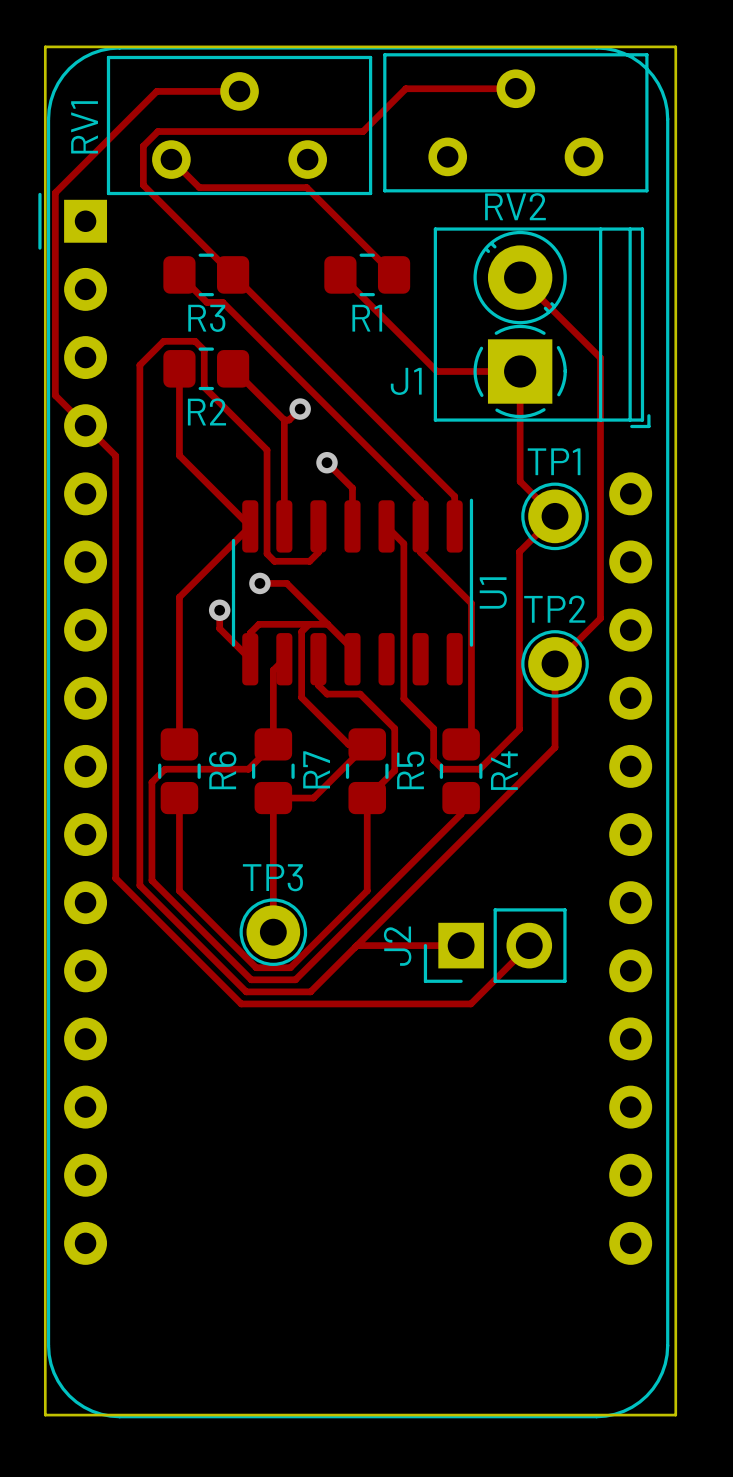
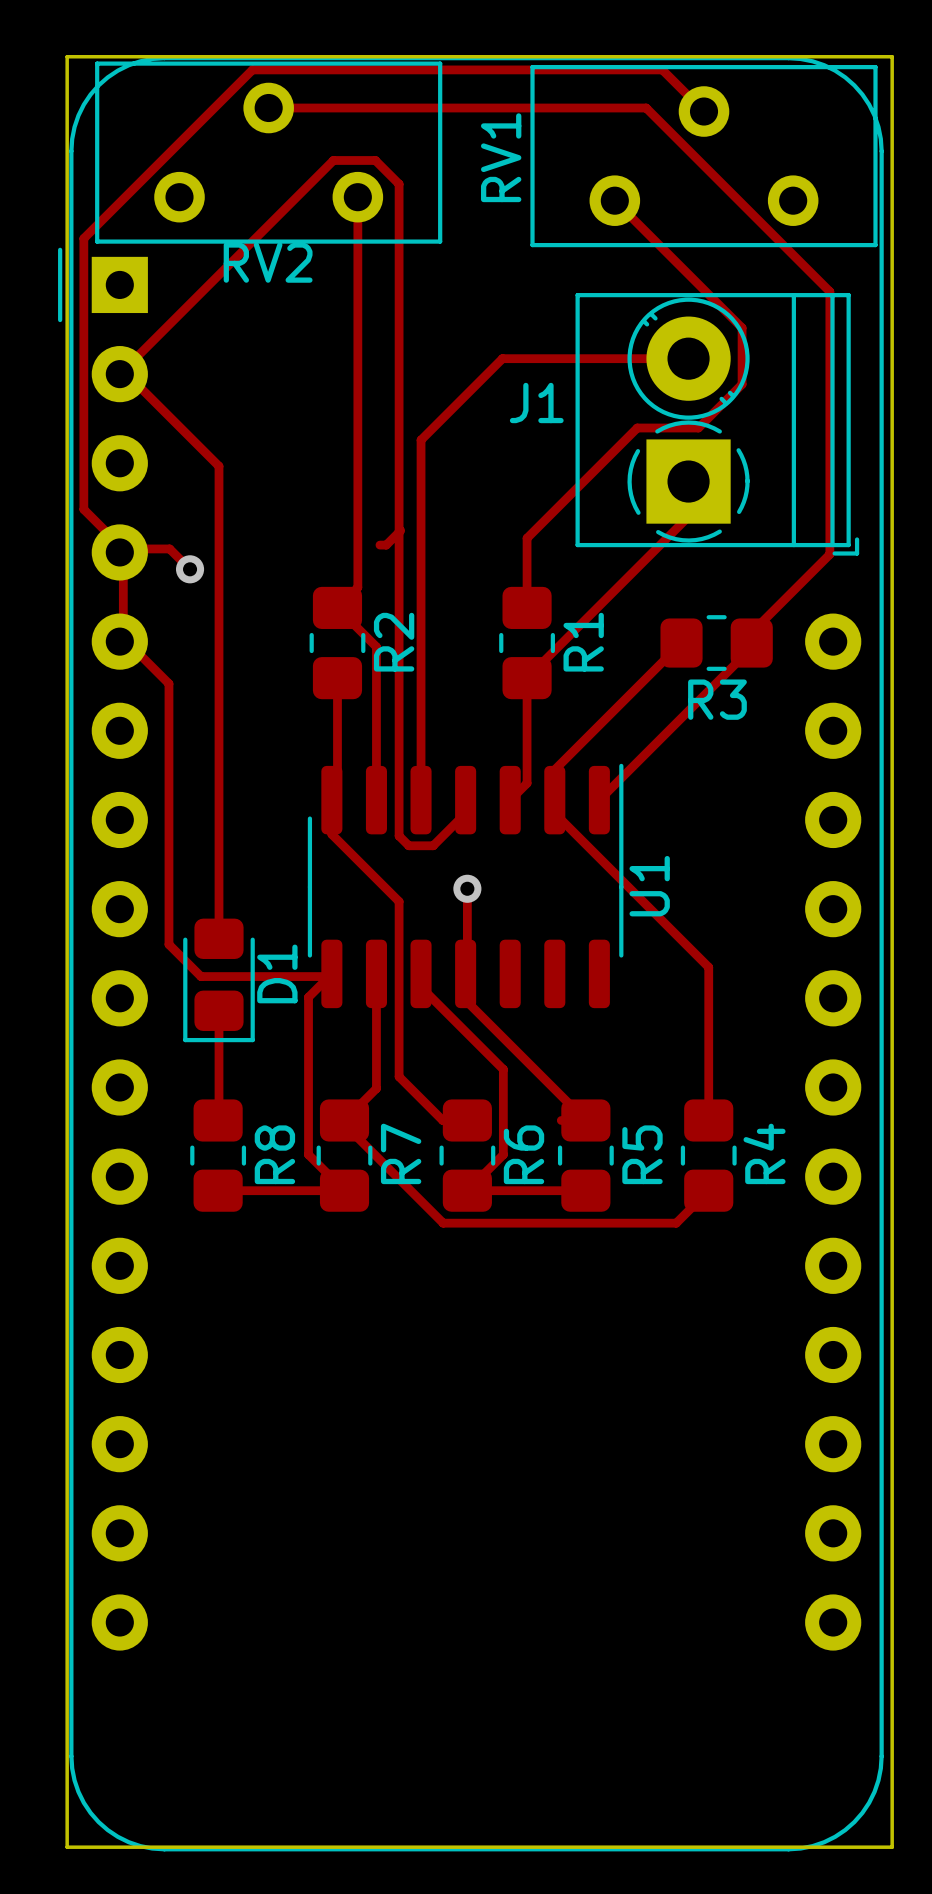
track: none -> (268, 108) (646, 108) (829, 291) (829, 554) (751, 632) (751, 647) (599, 800)
track: (515, 88) (405, 88) (363, 131) (157, 131) (143, 146) (143, 185) (454, 496) (454, 526) -> none
track: none -> (704, 111) (662, 69) (252, 69) (83, 238) (83, 509) (123, 548)
track: (239, 91) (156, 91) (55, 192) (55, 395) (115, 455) (115, 878) (241, 1003) (470, 1003) (529, 945) -> none
RV2 position: (515, 122) -> (268, 152)
RV1 position: (239, 125) -> (704, 156)
track: none -> (357, 197) (357, 587) (337, 607) (376, 646) (376, 800)
track: none -> (614, 200) (742, 327) (742, 384) (698, 428) (637, 428) (527, 538) (527, 607)
track: (171, 159) (199, 187) (306, 187) (394, 274) -> none
track: (179, 274) (206, 302) (222, 302) (420, 500) (420, 552) (471, 603) (471, 734) (461, 744) -> none
R3 position: (206, 274) -> (716, 643)
track: (340, 274) (436, 371) (520, 371) -> none
R1 rotation: 0° (367, 274) -> 90° clockwise (527, 643)
R1 position: (367, 274) -> (527, 643)
track: (520, 277) (600, 357) (600, 618) (555, 663) (555, 747) (310, 991) (246, 991) (139, 885) (139, 365) (163, 341) (195, 341) (204, 350) (204, 387) (267, 450) (267, 553) (274, 561) (309, 561) (318, 552) (318, 526) -> (688, 358) (502, 358) (421, 440) (421, 800)
R1 name position: R1 (367, 318) -> R1 (583, 642)
track: (179, 368) (179, 455) (250, 526) (179, 597) (179, 744) -> none
R2 rotation: 0° (206, 368) -> 90° clockwise (337, 643)
R2 position: (206, 368) -> (337, 643)
track: (233, 368) (284, 420) (284, 526) -> none
J1 name position: J1 (406, 381) -> J1 (536, 402)
track: (520, 398) (520, 481) (555, 516) (519, 551) (519, 729) (479, 769) (442, 769) (433, 760) (433, 728) (403, 698) (403, 543) (386, 526) (386, 505) -> (688, 516) (527, 678) (527, 783) (510, 800) (510, 772)
via: (300, 409) -> none
R2 name position: R2 (206, 411) -> R2 (394, 642)
track: none -> (123, 548) (169, 548) (190, 569)
track: none -> (123, 548) (123, 638) (168, 683) (168, 944) (200, 976) (329, 976)
via: none -> (190, 569)
track: (326, 462) (352, 488) (352, 526) -> none
via: (326, 462) -> none
track: none -> (681, 643) (554, 769)
TP1: (555, 516) -> none
track: none -> (337, 678) (337, 794) (331, 800) (331, 834) (399, 901) (399, 1076) (442, 1120) (467, 1120)
track: (259, 583) (286, 583) (352, 649) (352, 659) -> none
via: (259, 583) -> none
U1 position: (352, 592) -> (465, 885)
track: (219, 610) (219, 628) (250, 659) (250, 633) (258, 624) (327, 624) -> none
via: (219, 610) -> none
track: none -> (465, 800) (465, 813) (433, 845) (408, 845) (399, 836) (399, 184) (375, 160) (333, 160) (123, 370) (219, 466) (219, 938)
track: (309, 624) (301, 631) (301, 697) (348, 744) (367, 744) (313, 798) (273, 798) (273, 932) -> none
track: none -> (554, 813) (708, 967) (708, 1120) (722, 1106)
track: (284, 659) (273, 670) (273, 744) (248, 769) (165, 769) (151, 782) (151, 880) (251, 979) (295, 979) (461, 814) (461, 798) -> none
track: (318, 659) (318, 685) (327, 694) (360, 694) (394, 728) (394, 770) (367, 798) (367, 890) (290, 967) (256, 967) (179, 890) (179, 798) -> none
TP2: (555, 663) -> none
track: none -> (467, 888) (467, 972) (465, 973)
via: none -> (467, 888)
track: none -> (465, 960) (465, 1000) (585, 1120) (561, 1120)
track: none -> (331, 973) (308, 997) (308, 1154) (344, 1190) (218, 1190)
track: none -> (376, 973) (376, 1088) (344, 1120) (344, 1124) (443, 1223) (676, 1223) (708, 1190)
track: none -> (421, 973) (421, 987) (503, 1069) (503, 1154) (467, 1190) (585, 1190)
D1: none -> (219, 980)
R6 position: (179, 771) -> (467, 1155)
R7 position: (273, 771) -> (344, 1155)
R5 position: (367, 771) -> (585, 1155)
R4 position: (461, 771) -> (708, 1155)
track: none -> (219, 1010) (218, 1120)
R8: none -> (218, 1155)
TP3: (273, 932) -> none
track: (356, 945) (461, 945) -> none
J2: (495, 945) -> none

